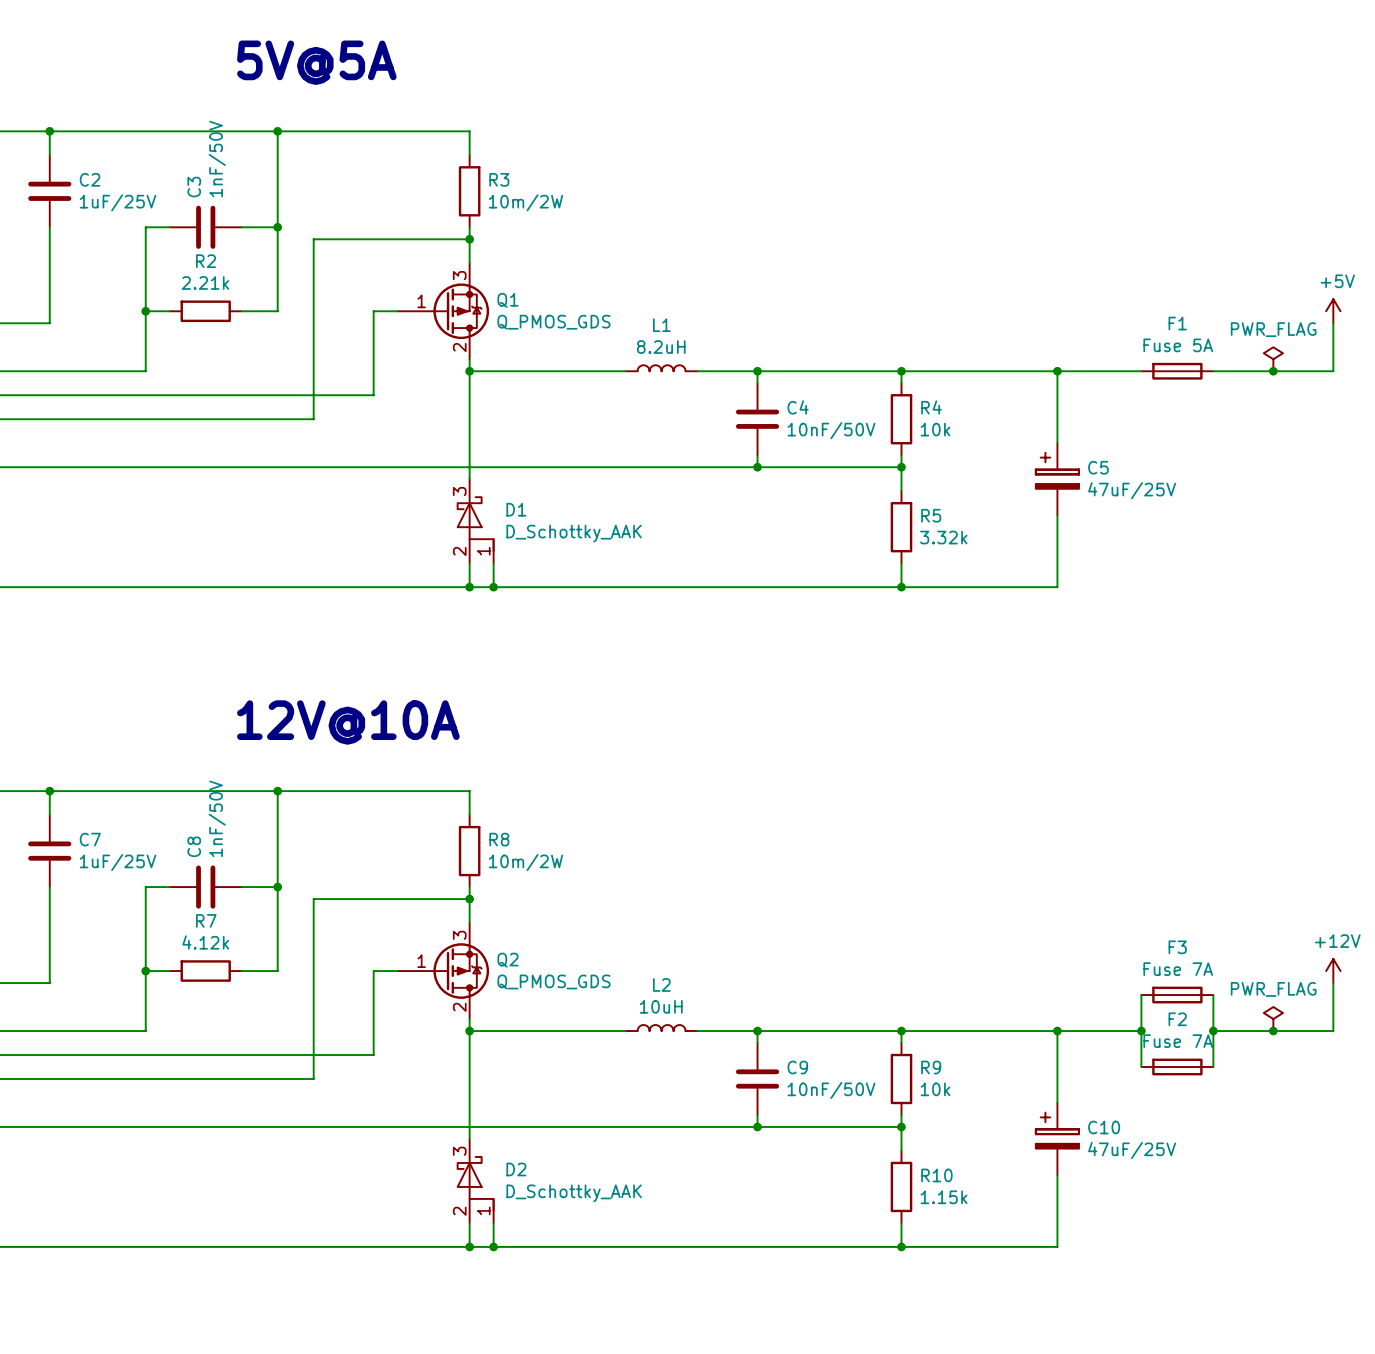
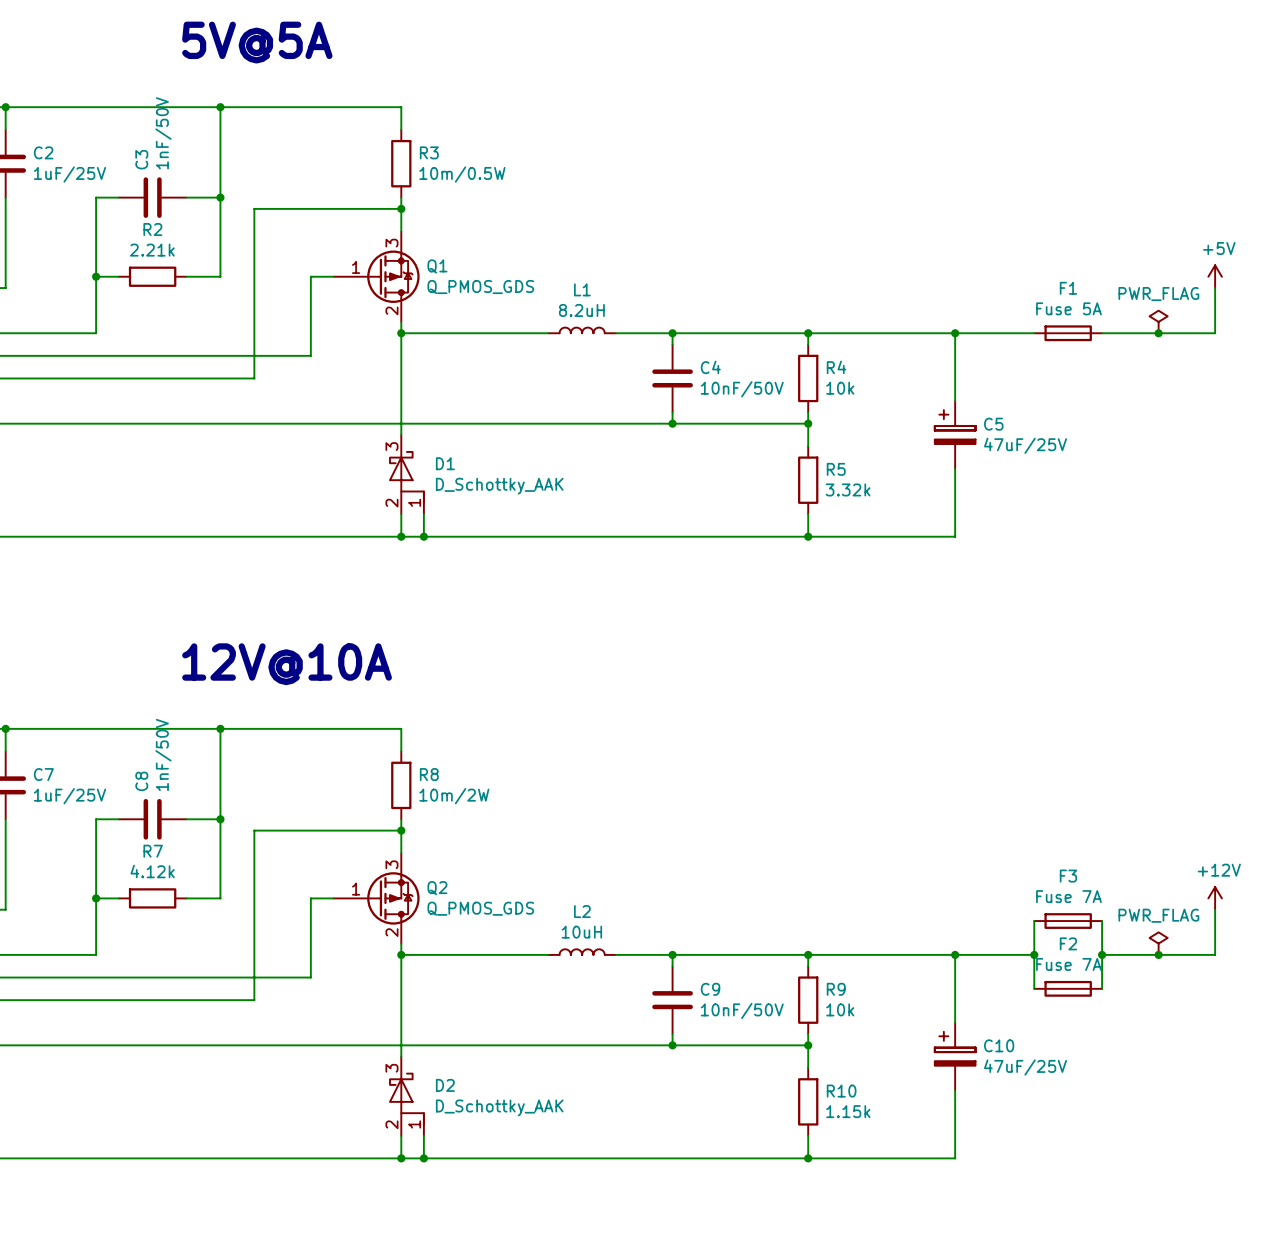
R3 value: 10m/2W (525, 202) -> 10m/0.5W (462, 174)

